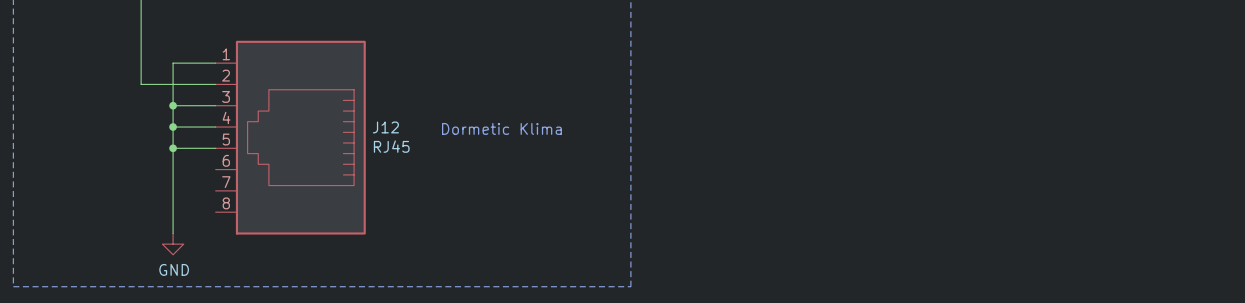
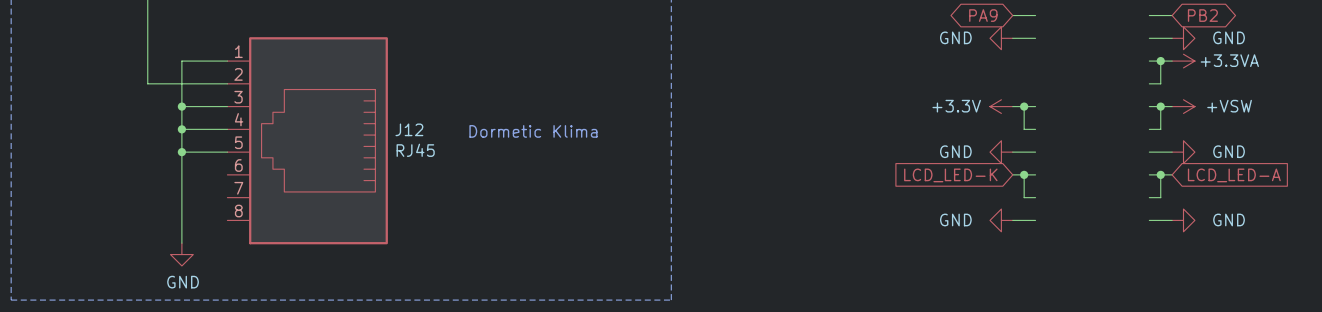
global label: none -> PA9 (983, 15)
wire: none -> (1012, 15) (1035, 15)
wire: none -> (1149, 15) (1172, 15)
global label: none -> PB2 (1202, 15)
power symbol: none -> GND (1001, 38)
wire: none -> (1012, 38) (1035, 38)
wire: none -> (1149, 38) (1172, 38)
power symbol: none -> GND (1183, 38)
wire: none -> (1149, 61) (1172, 61)
wire: none -> (1160, 61) (1160, 83) (1149, 83)
junction: none -> (1160, 61)
power symbol: none -> +3.3VA (1183, 61)
power symbol: none -> +3.3V (1001, 106)
wire: none -> (1012, 106) (1035, 106)
wire: none -> (1024, 106) (1024, 129) (1035, 129)
junction: none -> (1024, 106)
wire: none -> (1149, 106) (1172, 106)
wire: none -> (1160, 106) (1160, 129) (1149, 129)
junction: none -> (1160, 106)
power symbol: none -> +VSW (1183, 106)
power symbol: none -> GND (1001, 152)
wire: none -> (1012, 152) (1035, 152)
wire: none -> (1149, 152) (1172, 152)
power symbol: none -> GND (1183, 152)
wire: none -> (1012, 174) (1035, 174)
wire: none -> (1024, 174) (1024, 197) (1035, 197)
junction: none -> (1024, 174)
wire: none -> (1149, 174) (1172, 174)
wire: none -> (1160, 174) (1160, 197) (1149, 197)
junction: none -> (1160, 174)
global label: none -> LCD_LED-K (950, 175)
global label: none -> LCD_LED-A (1234, 175)
power symbol: none -> GND (1001, 220)
wire: none -> (1012, 220) (1035, 220)
wire: none -> (1149, 220) (1172, 220)
power symbol: none -> GND (1183, 220)

